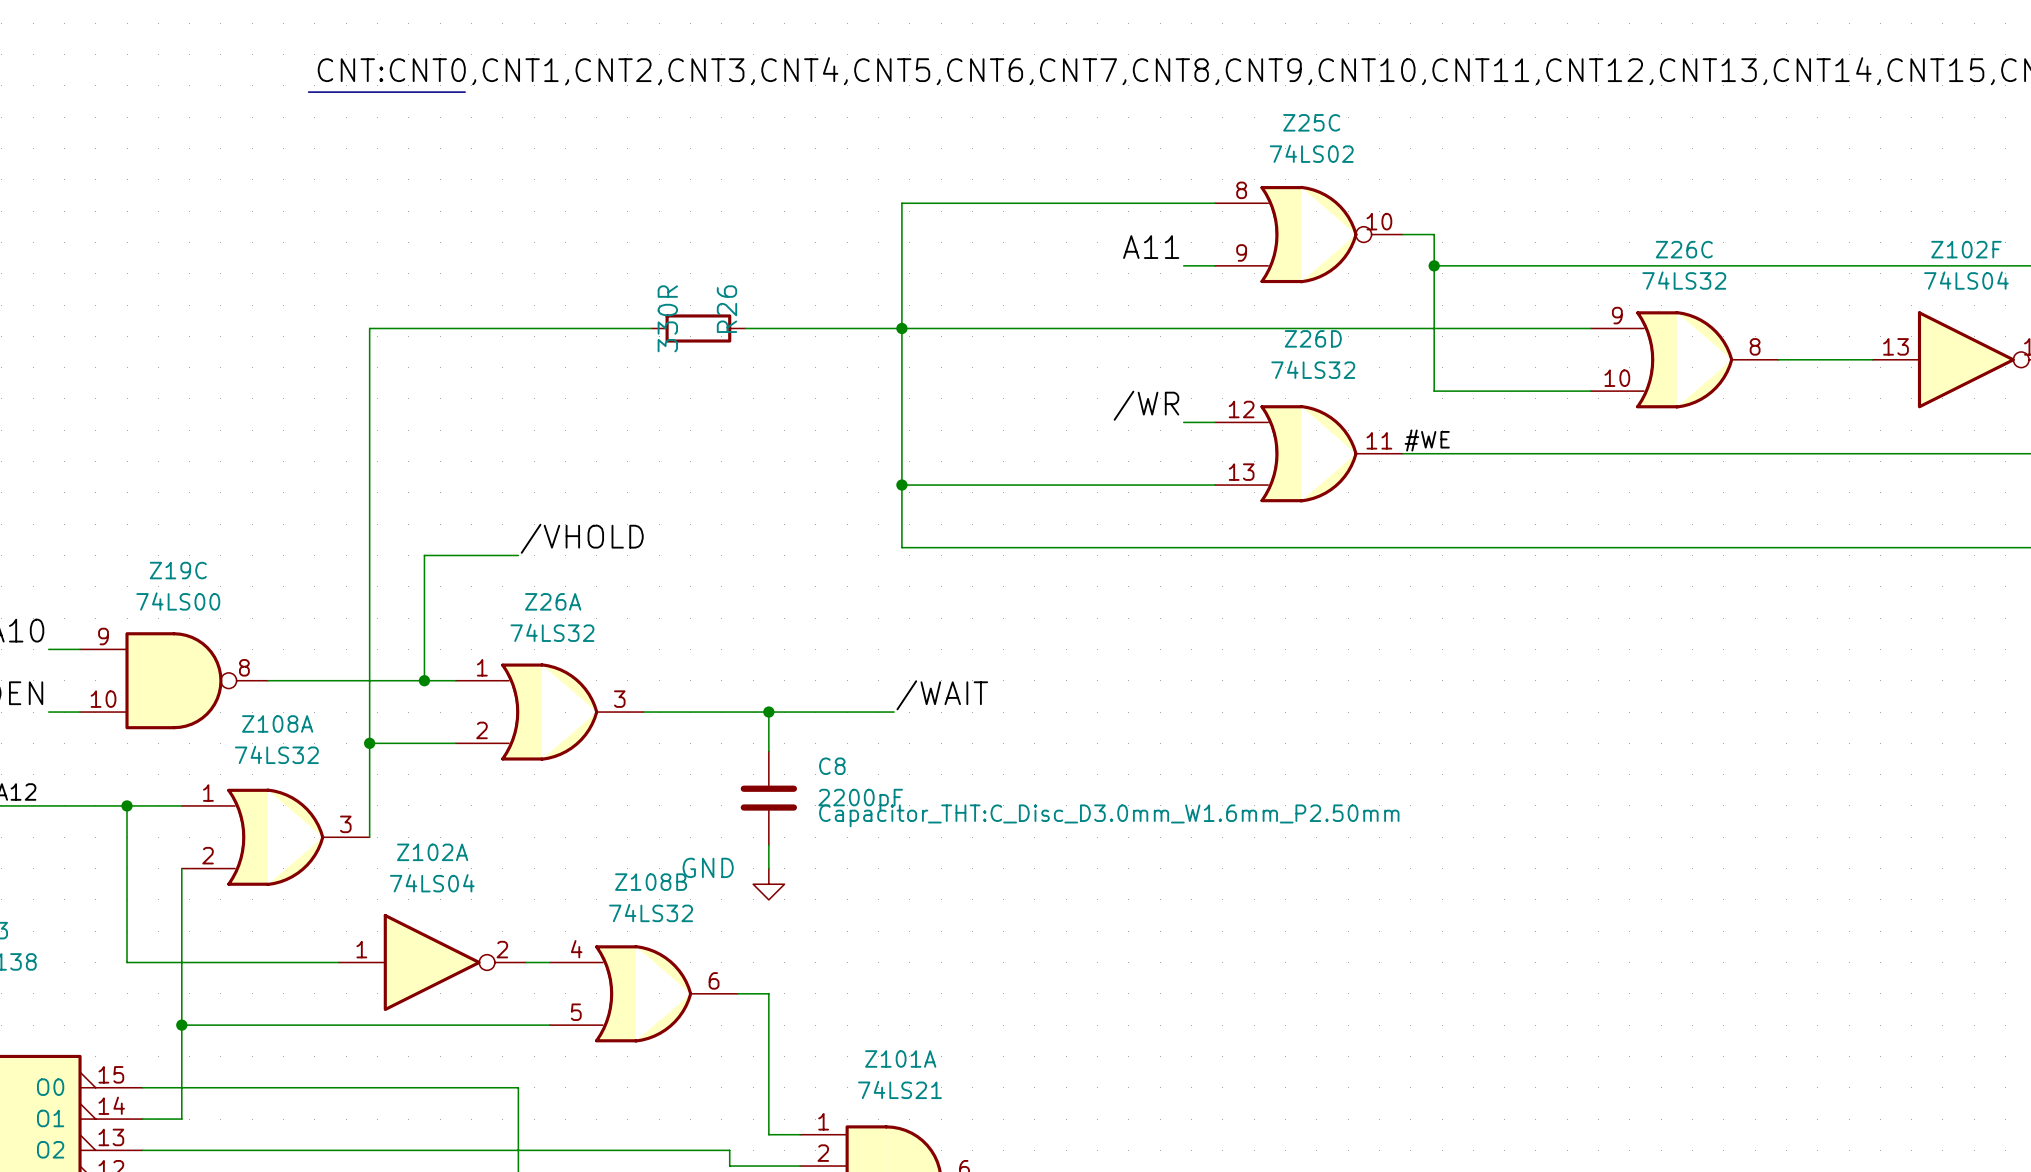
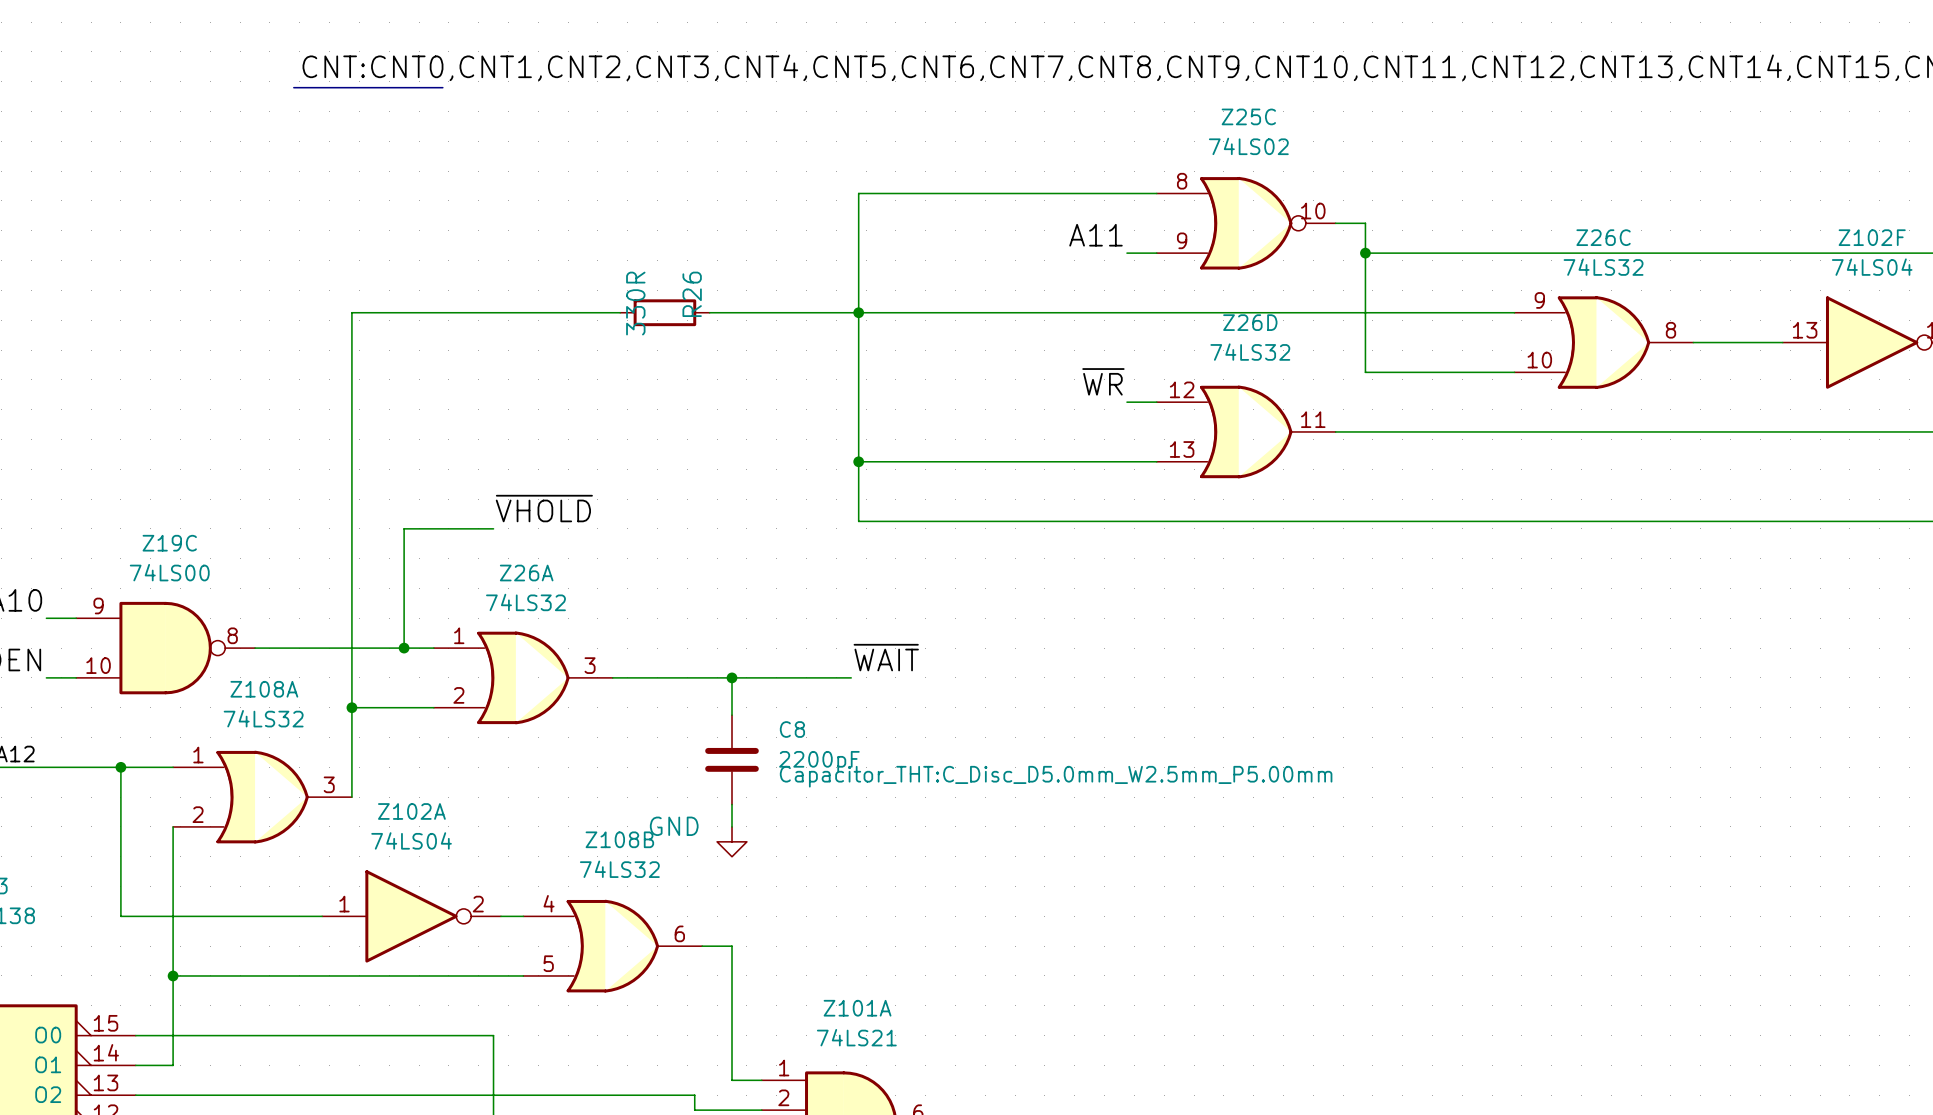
label: /WR (1146, 405) -> ~{WR} (1103, 381)
label: #WE (1427, 440) -> none
label: /VHOLD (582, 538) -> ~{VHOLD} (544, 508)
label: /WAIT (942, 695) -> ~{WAIT} (886, 657)
C8 text: Capacitor_THT:C_Disc_D3.0mm_W1.6mm_P2.50mm (1109, 815) -> Capacitor_THT:C_Disc_D5.0mm_W2.5mm_P5.00mm (1056, 776)

